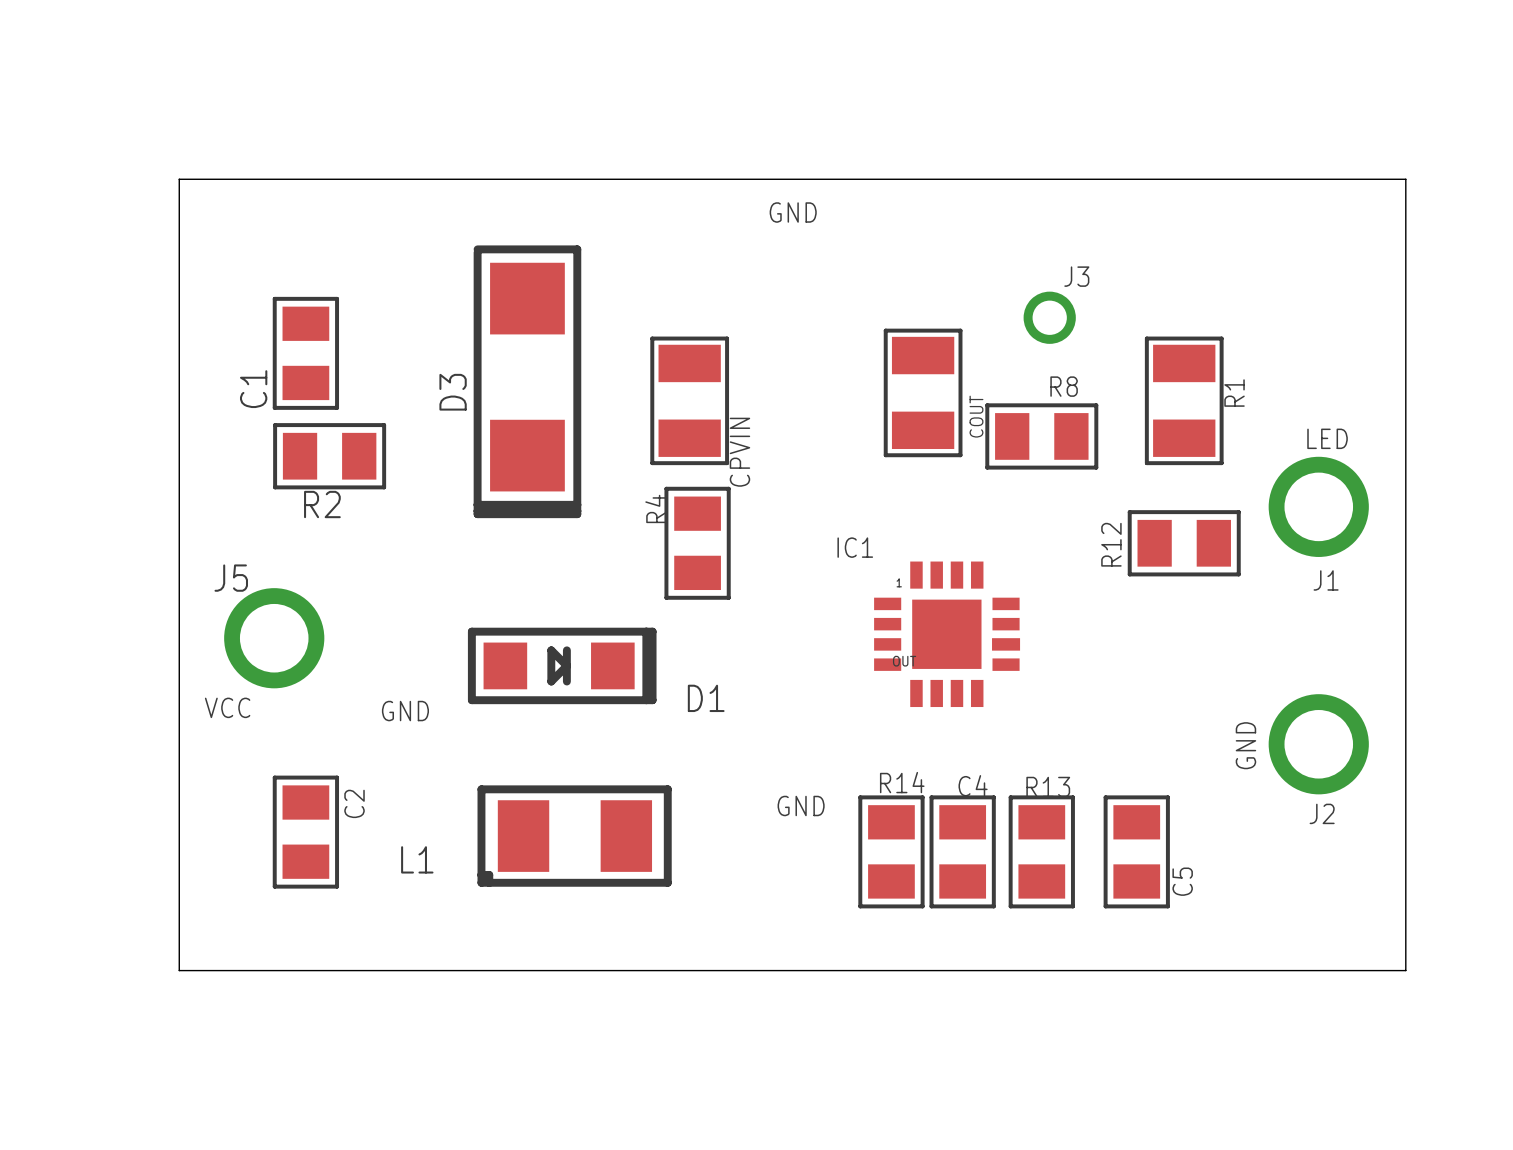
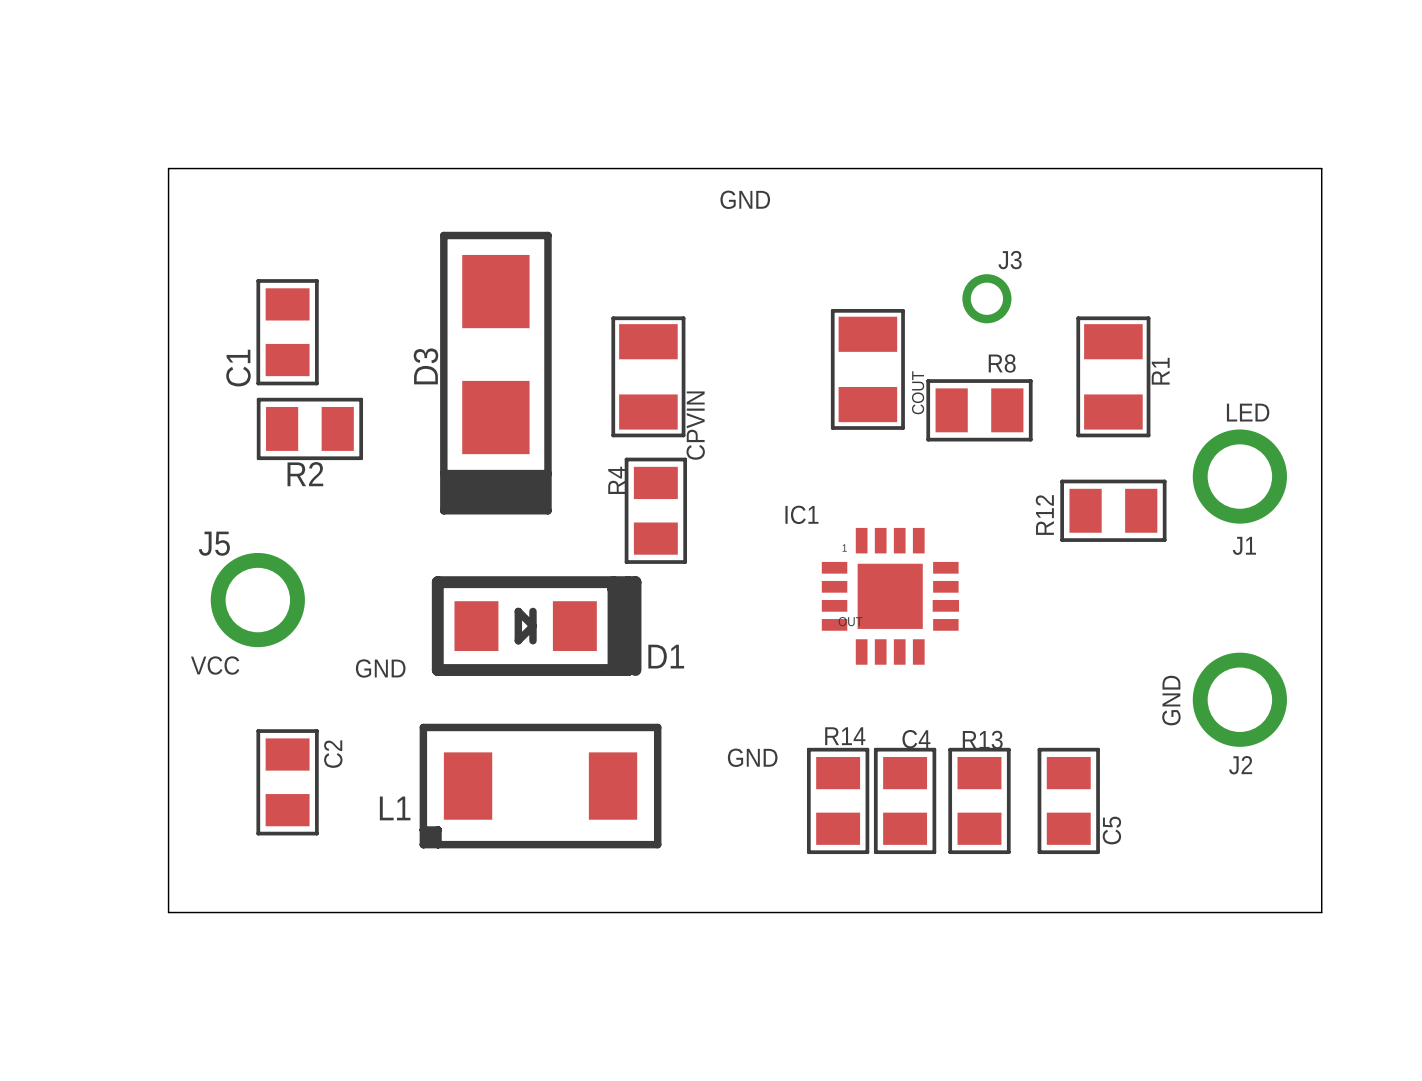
D3 footprint: [473, 245, 582, 519] -> [440, 231, 552, 515]
D1 footprint: [467, 627, 657, 705] -> [431, 576, 642, 676]
L1 footprint: [477, 785, 672, 887] -> [419, 723, 662, 849]

